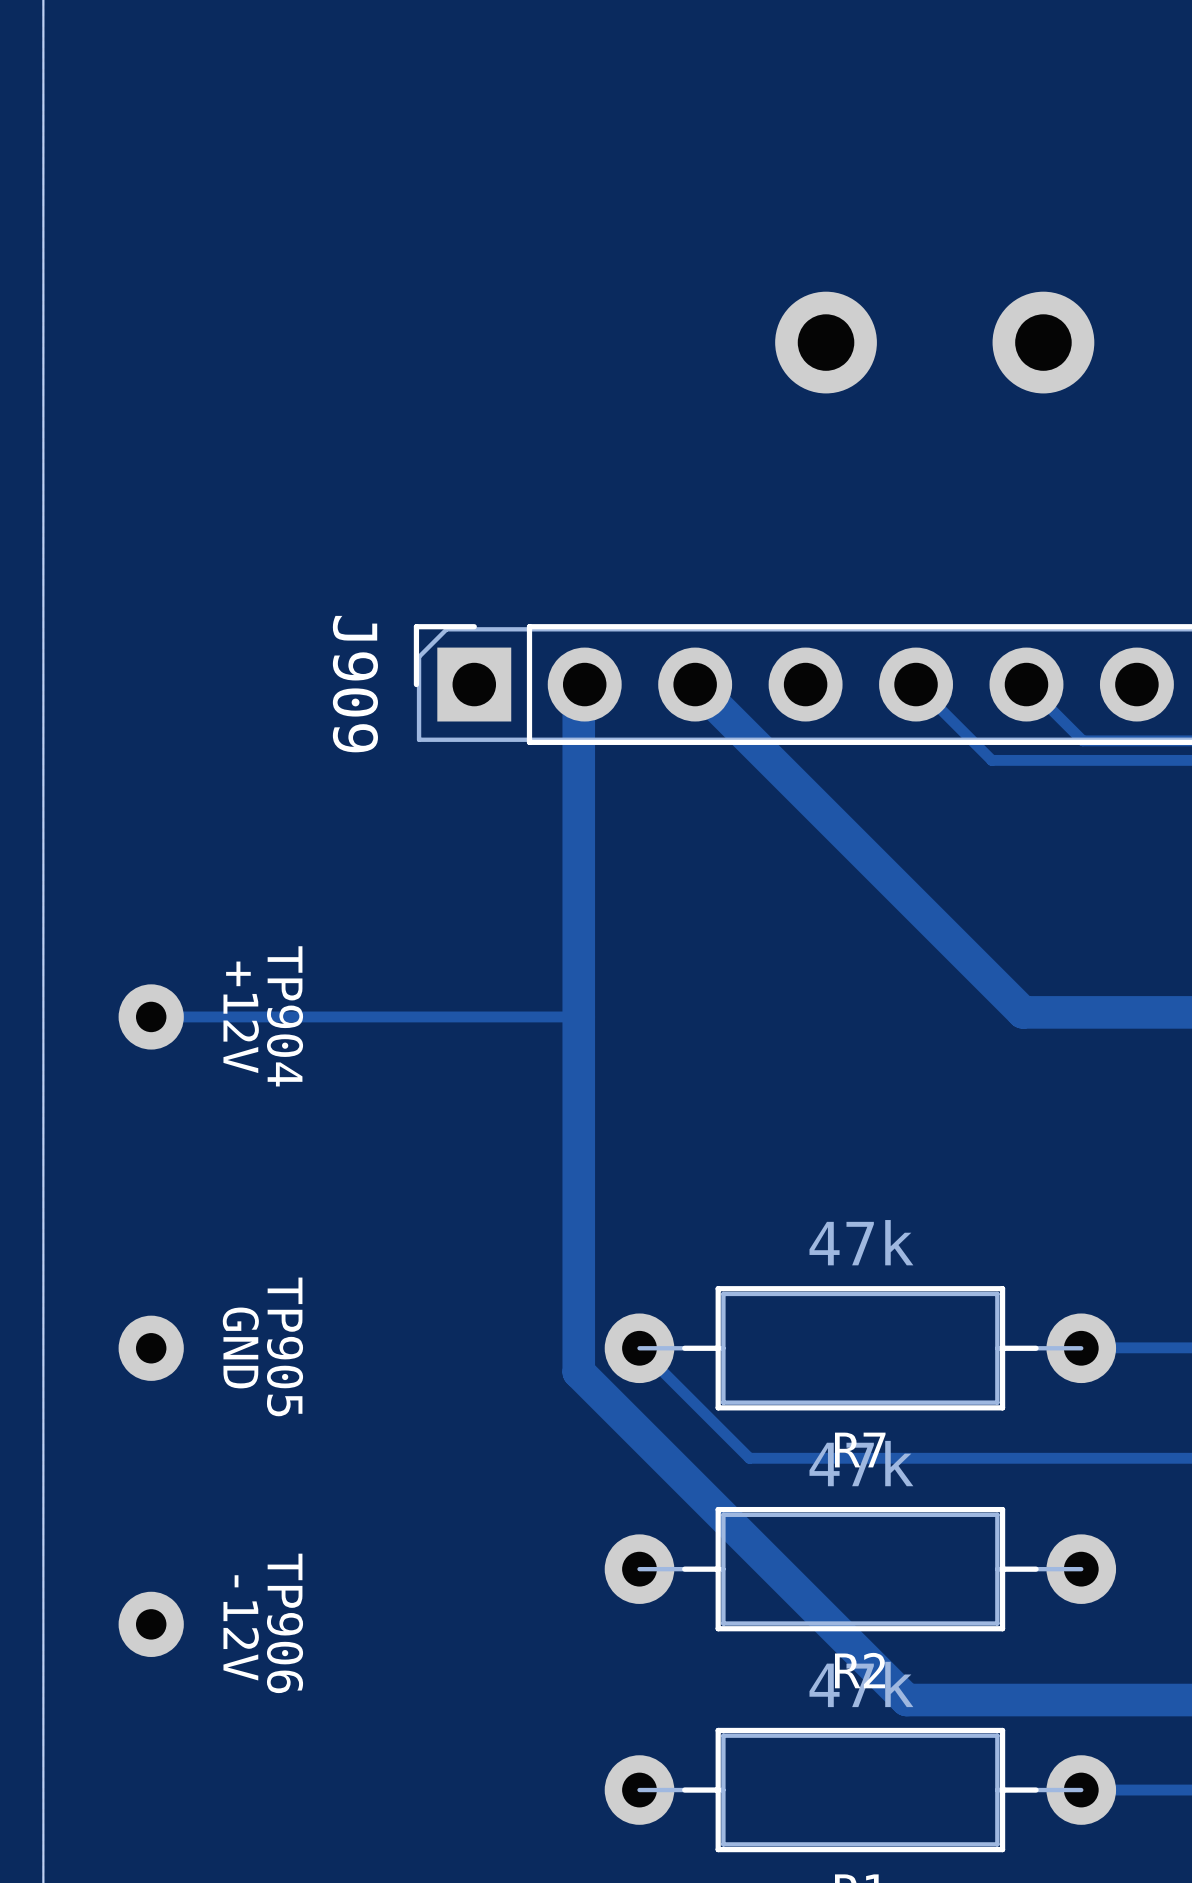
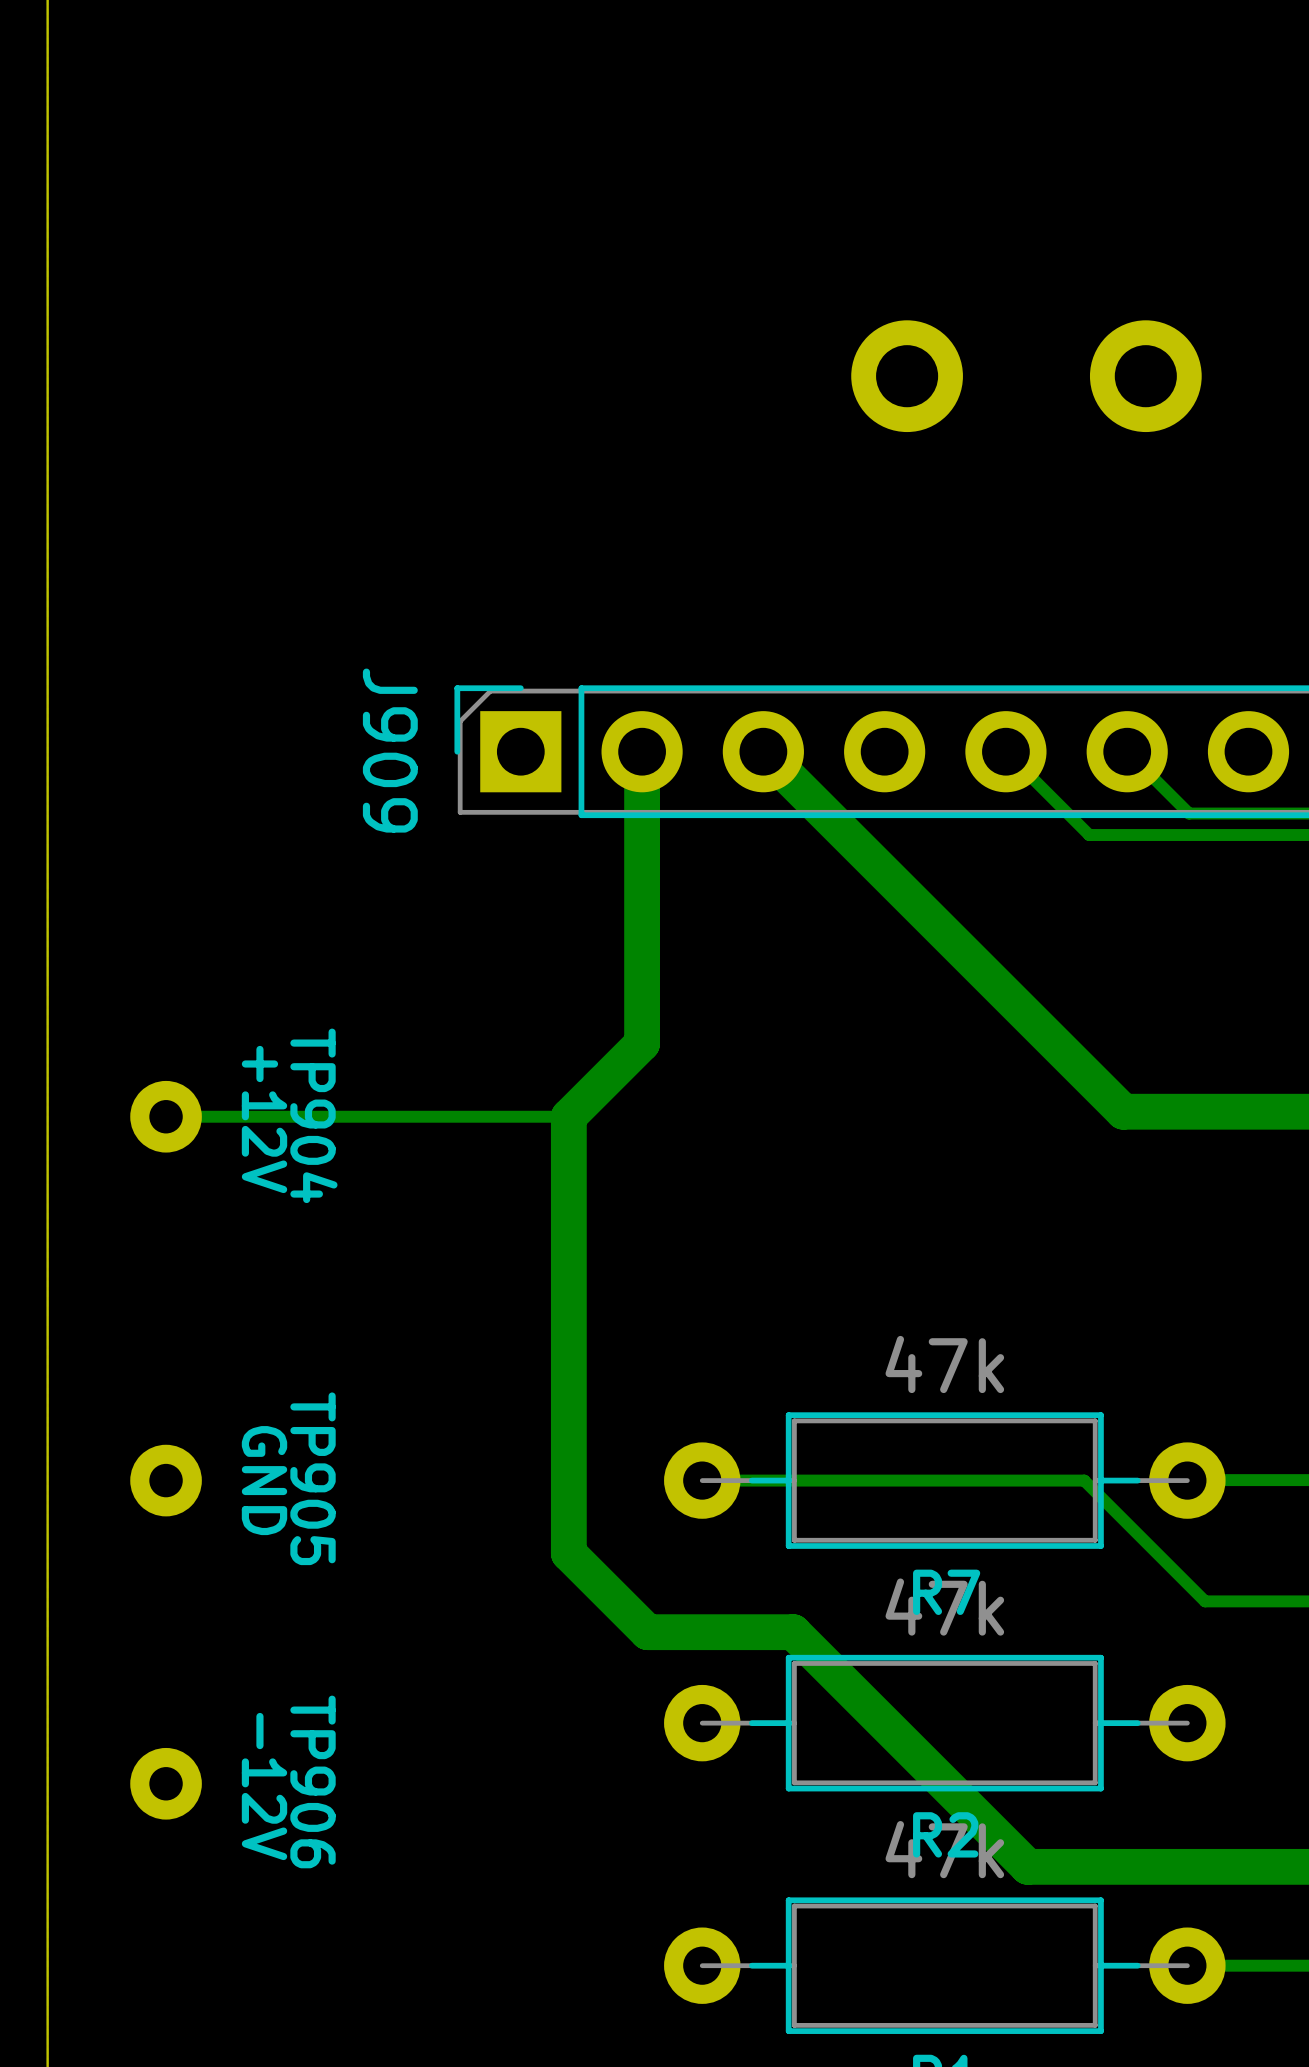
track: (584, 684) (578, 690) (578, 1372) (906, 1700) (936, 1700) -> (642, 751) (642, 1043) (568, 1116) (568, 1553) (647, 1632) (793, 1632) (1027, 1866)
track: (578, 1016) (518, 1016) -> none
track: (639, 1348) (749, 1458) (1097, 1458) -> (702, 1480) (1084, 1480) (1205, 1601)

